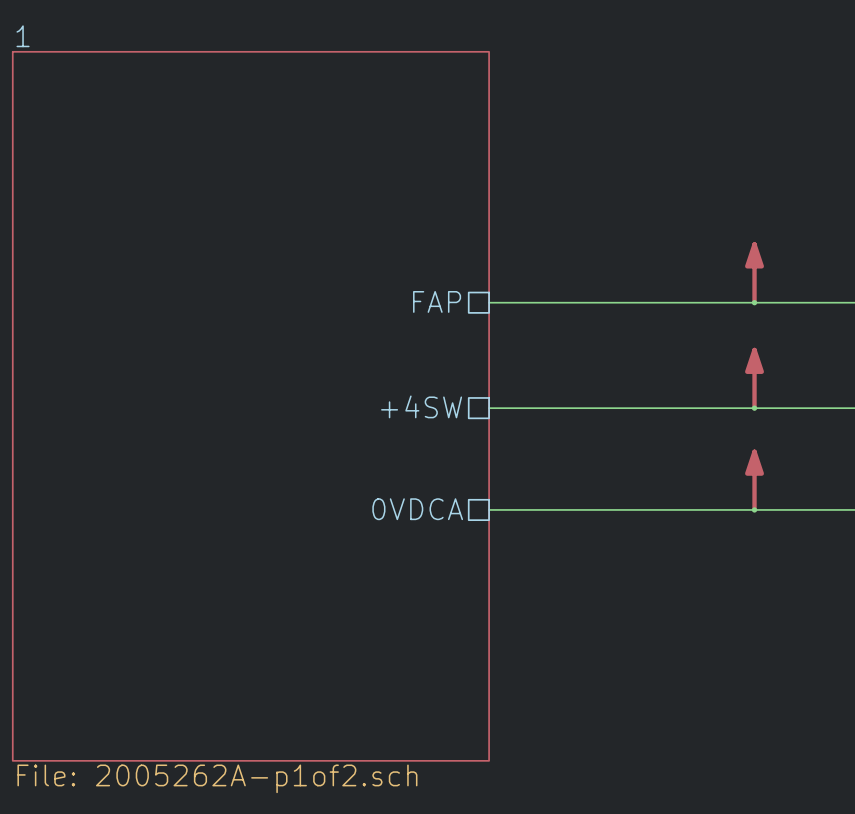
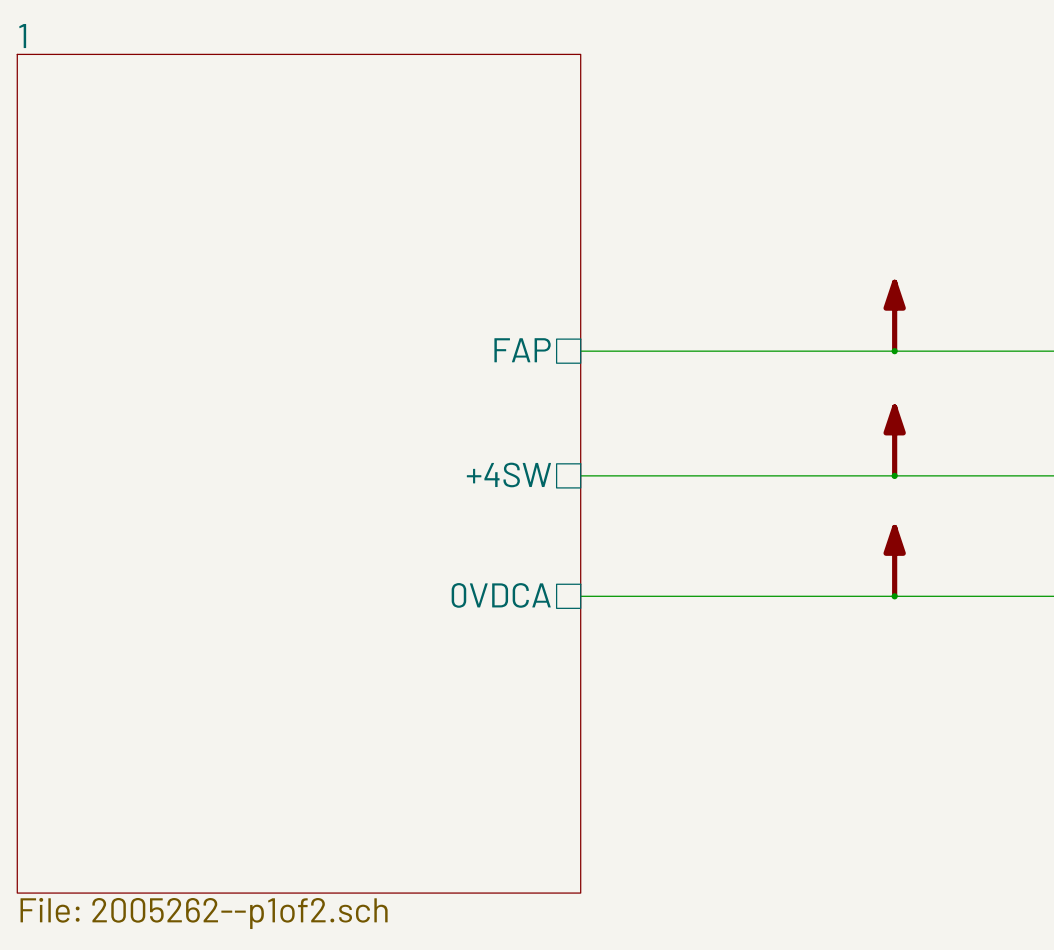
sheet 1 value: File: 2005262A-p1of2.sch (217, 778) -> File: 2005262--p1of2.sch (204, 913)

